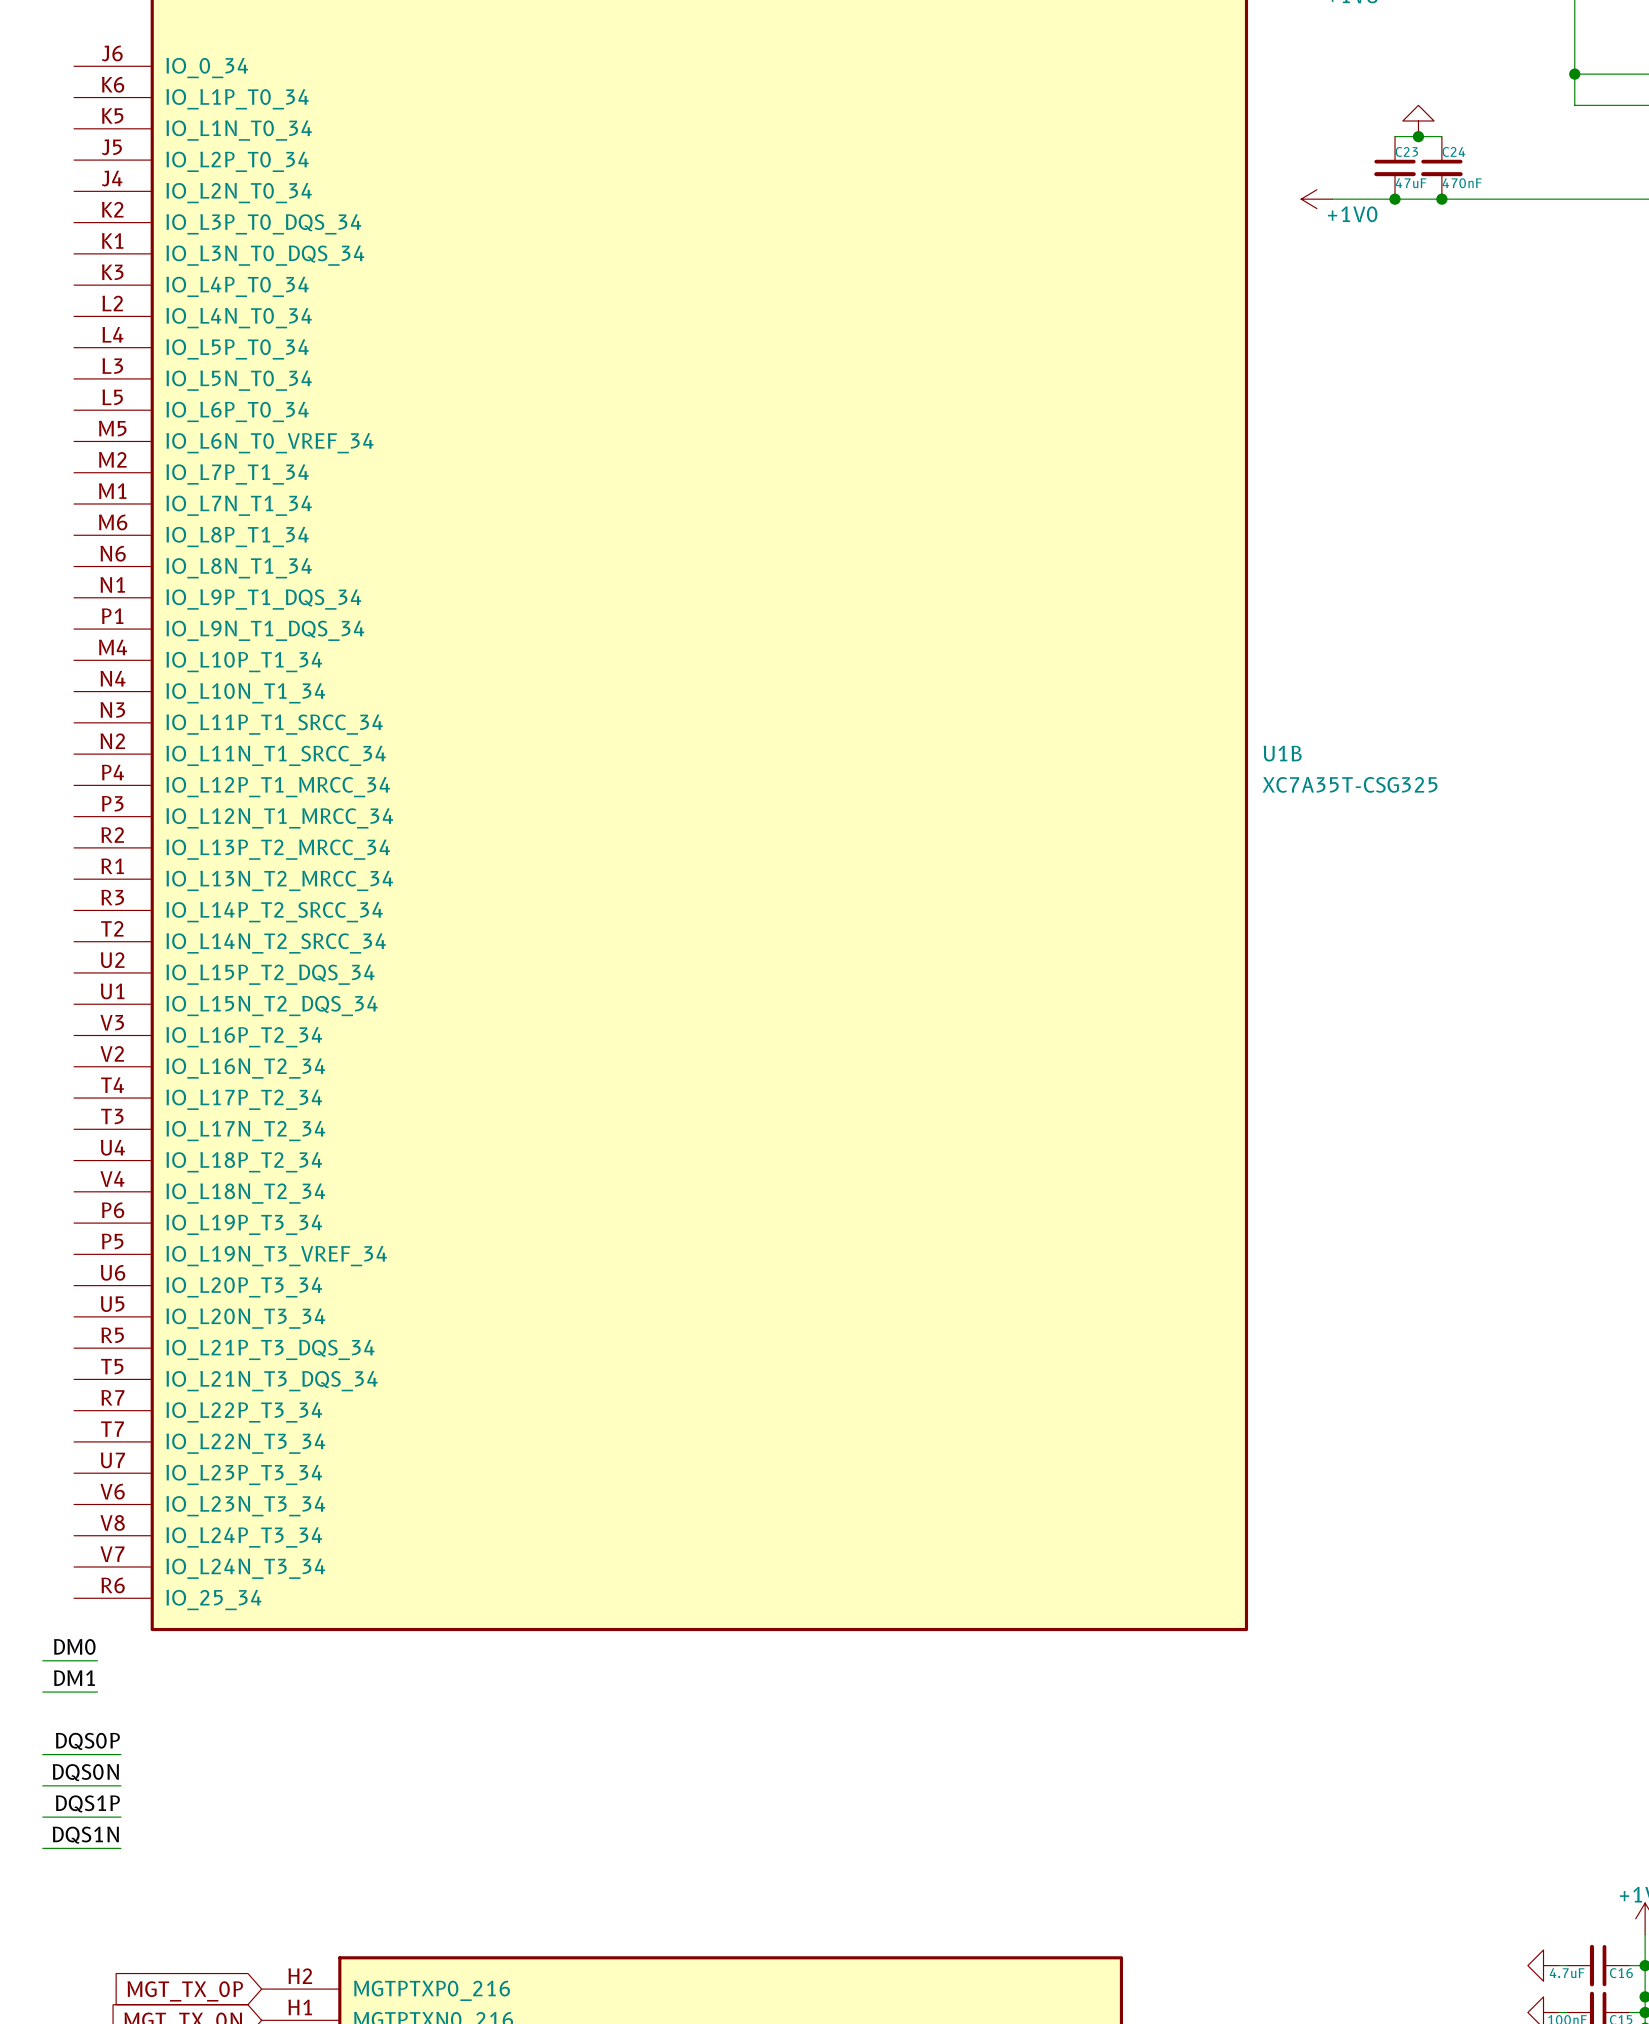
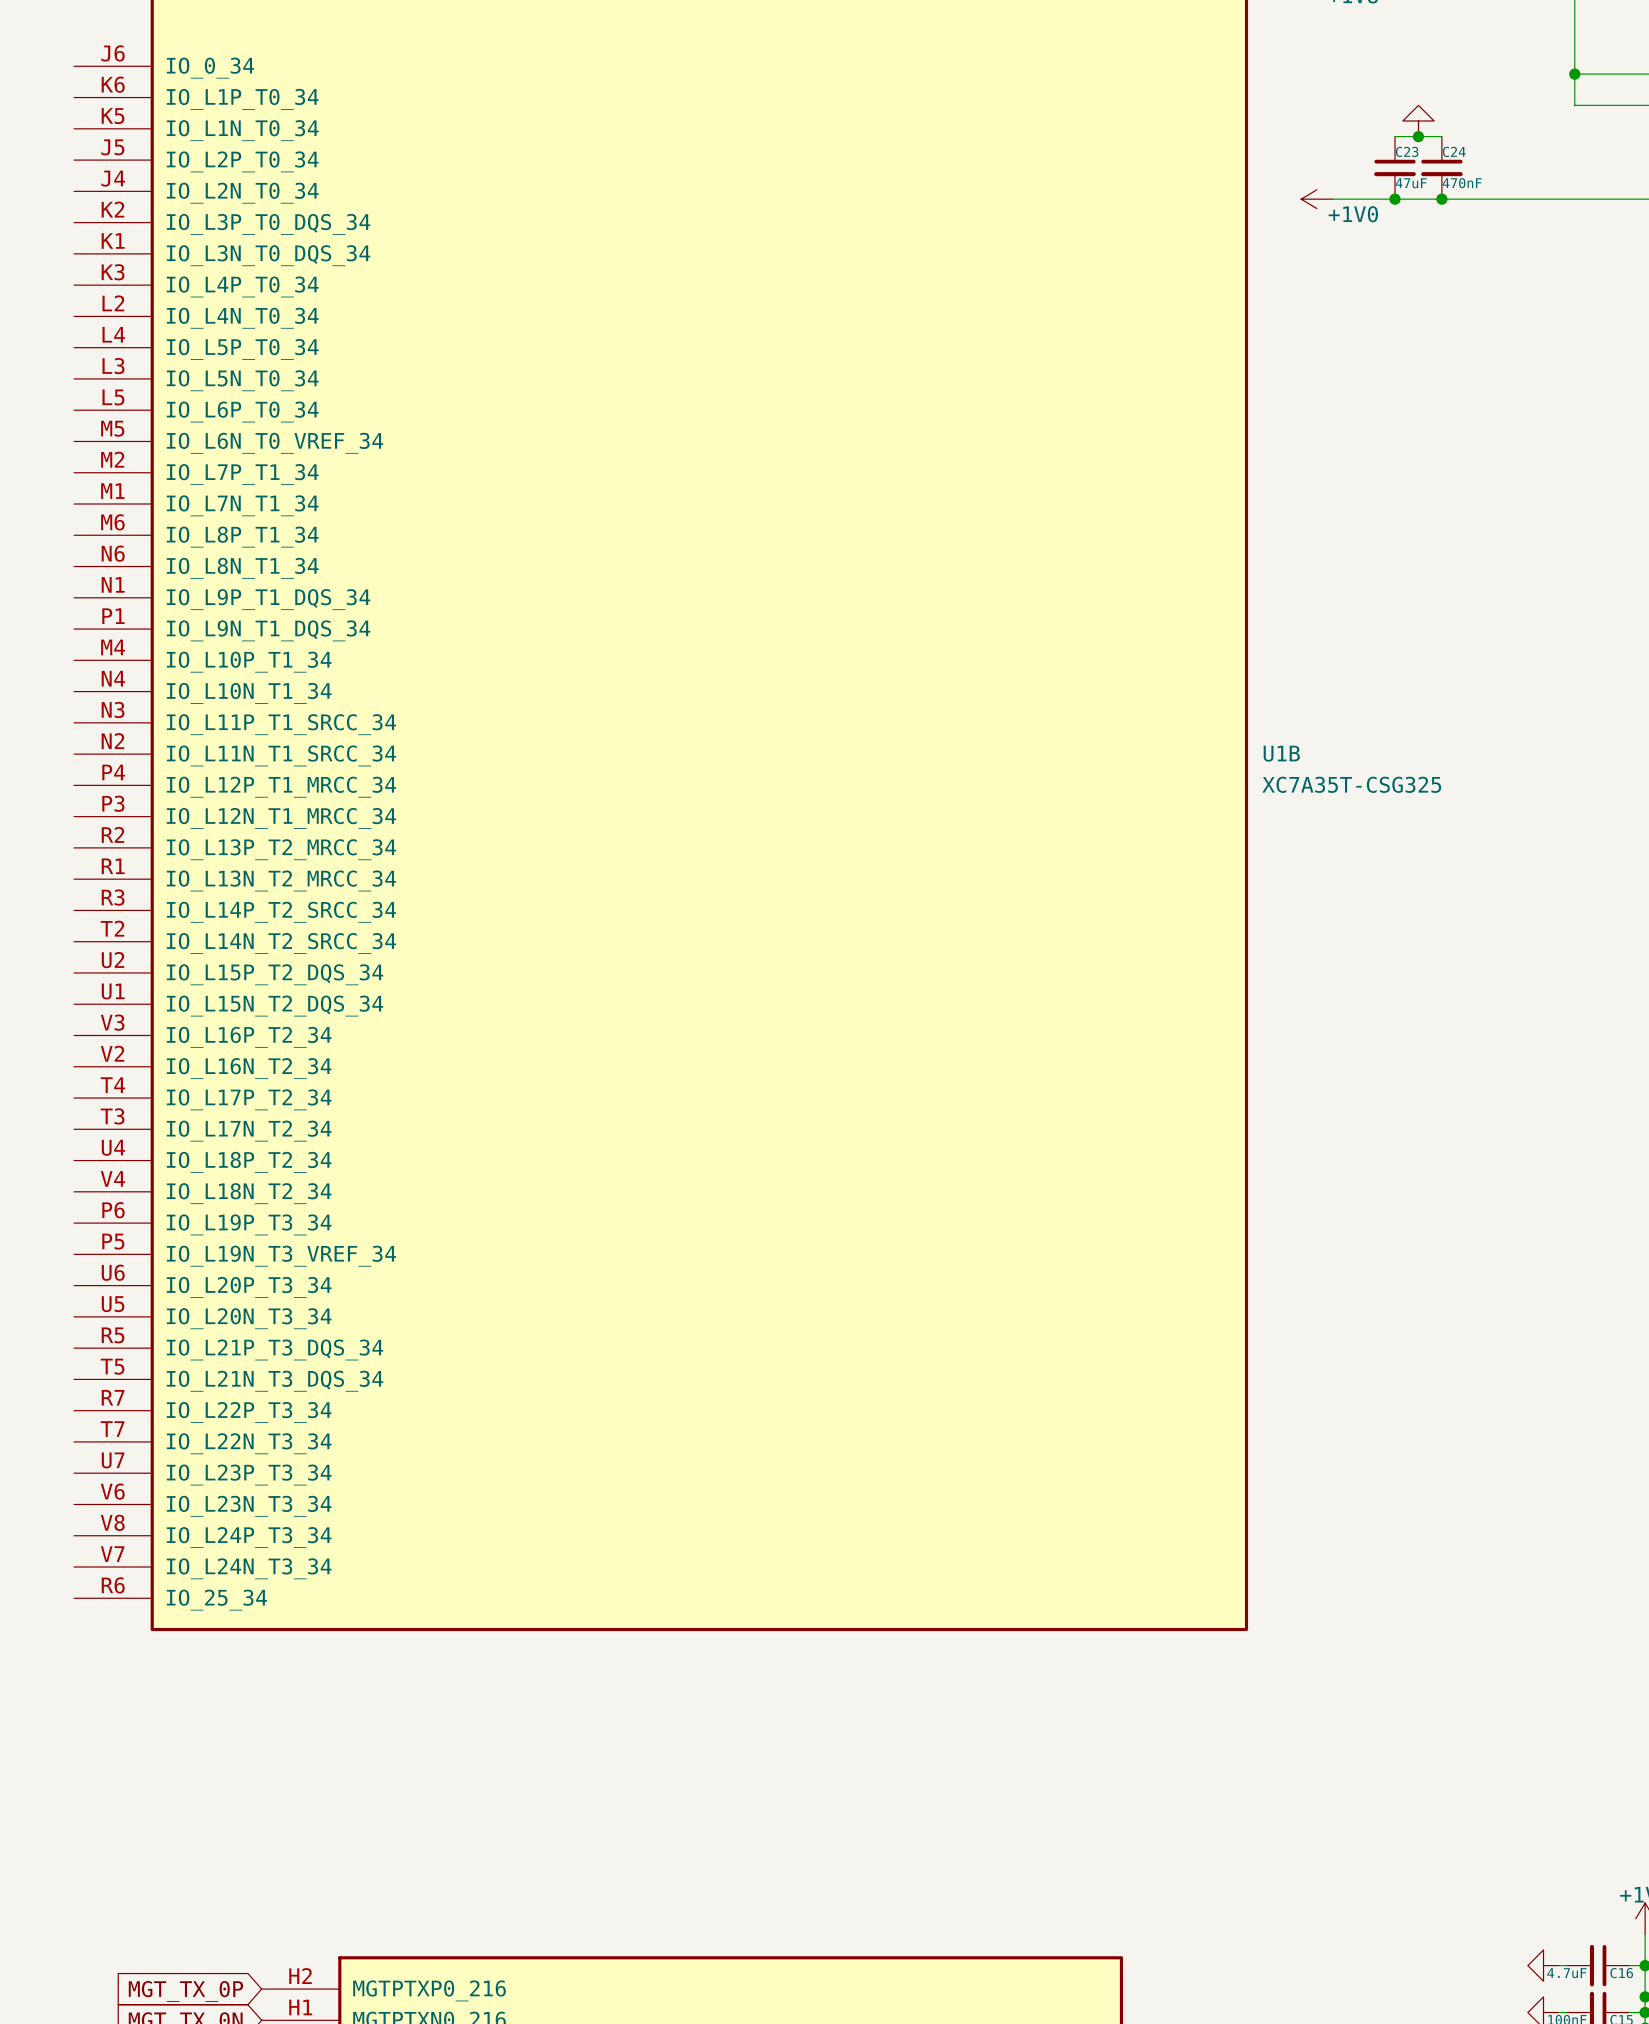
label: DM0 (74, 1646) -> none
wire: (42, 1660) (97, 1660) -> none
label: DM1 (74, 1678) -> none
wire: (42, 1692) (97, 1692) -> none
label: DQS0P (87, 1741) -> none
wire: (42, 1754) (120, 1754) -> none
label: DQS0N (85, 1772) -> none
wire: (42, 1785) (120, 1785) -> none
label: DQS1P (87, 1803) -> none
wire: (42, 1817) (120, 1817) -> none
label: DQS1N (85, 1835) -> none
wire: (42, 1848) (120, 1848) -> none

